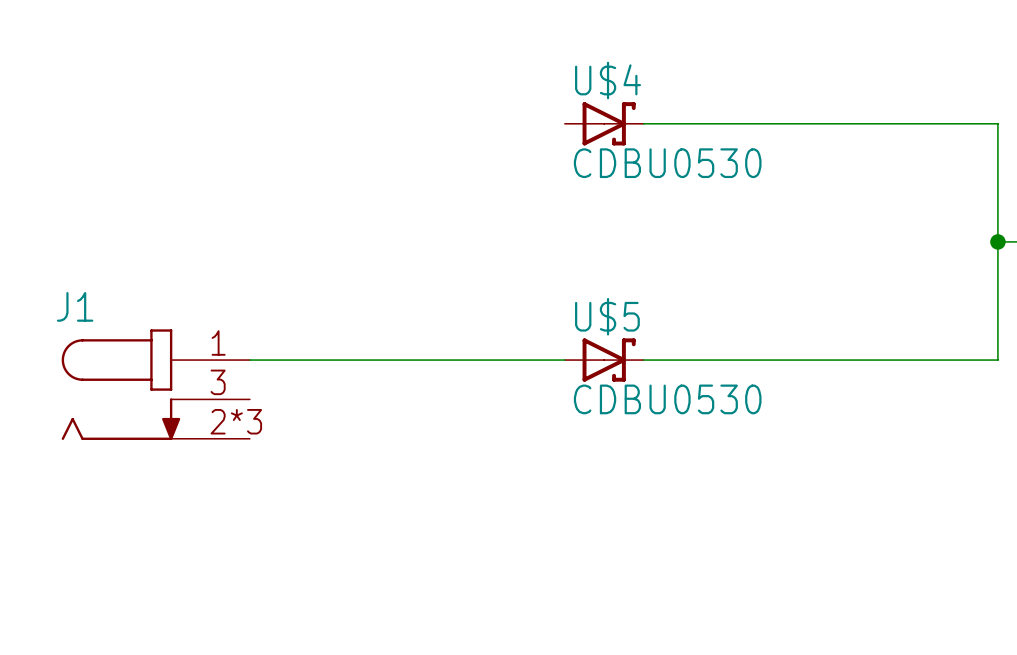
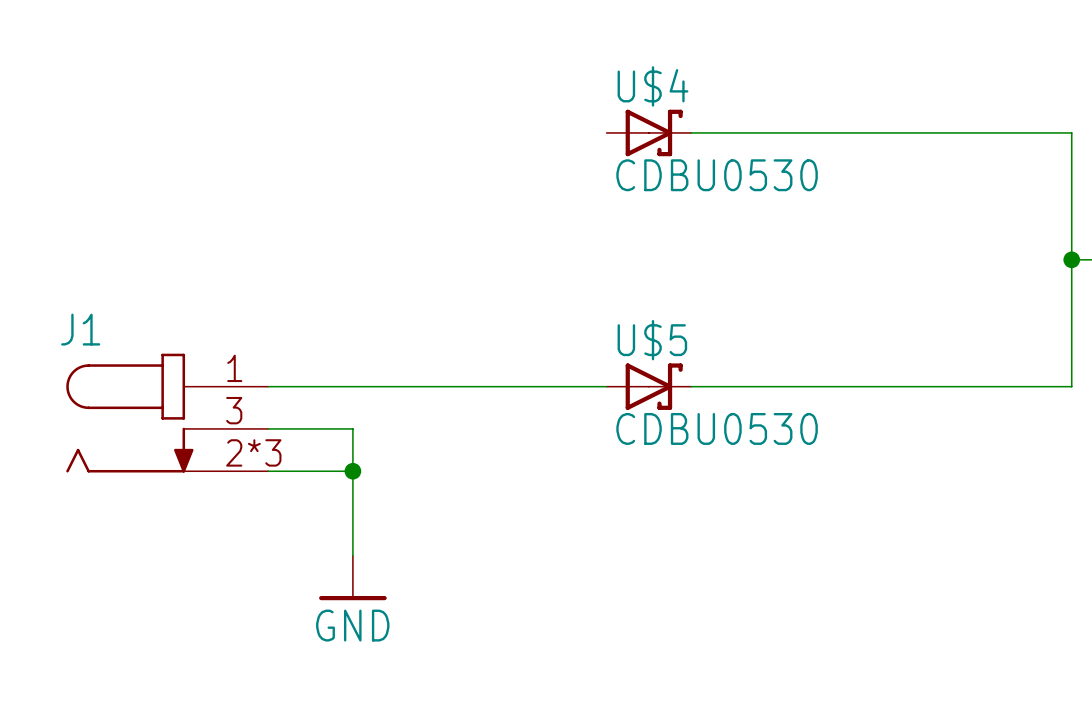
wire: none -> (268, 428) (352, 428) (352, 555)
wire: none -> (268, 471) (352, 471)
junction: none -> (352, 471)
power symbol: none -> GND (352, 578)

